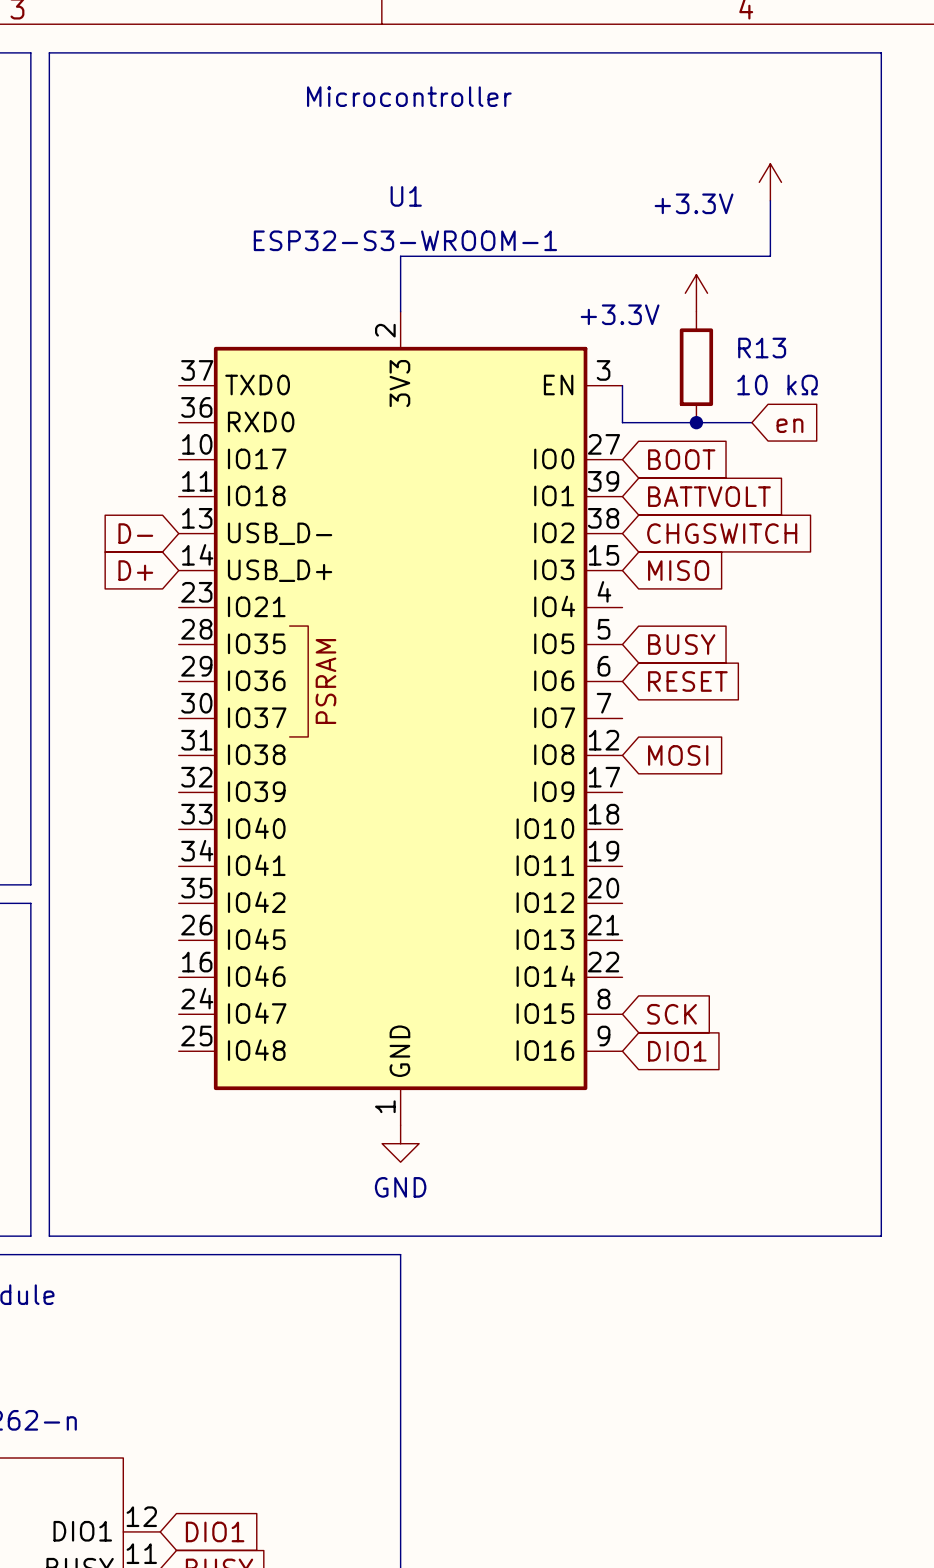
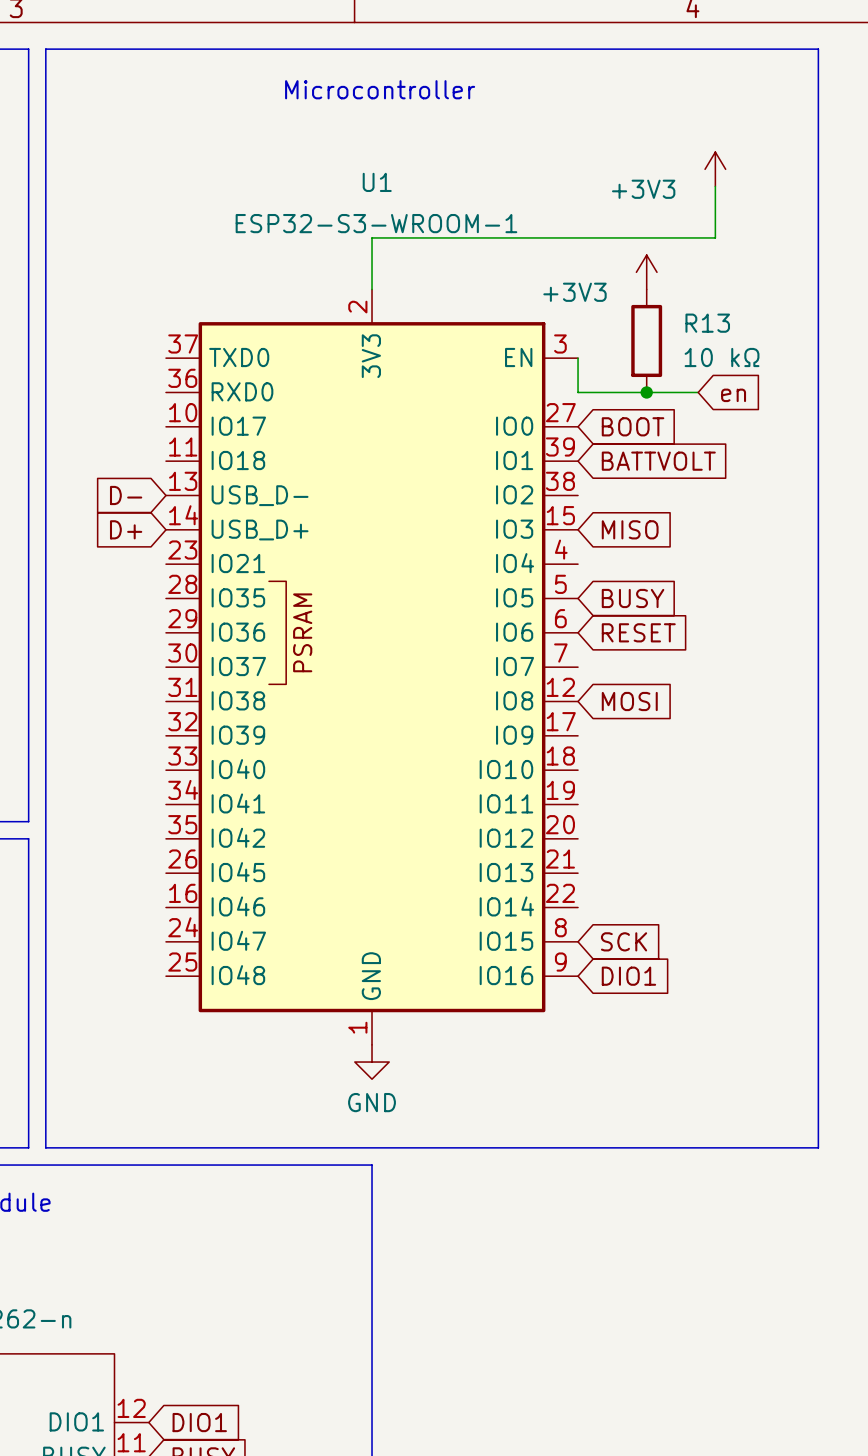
power symbol: +3.3V (770, 182) -> +3V3 (715, 169)
power symbol: +3.3V (696, 293) -> +3V3 (646, 272)
global label: CHGSWITCH (722, 533) -> none

